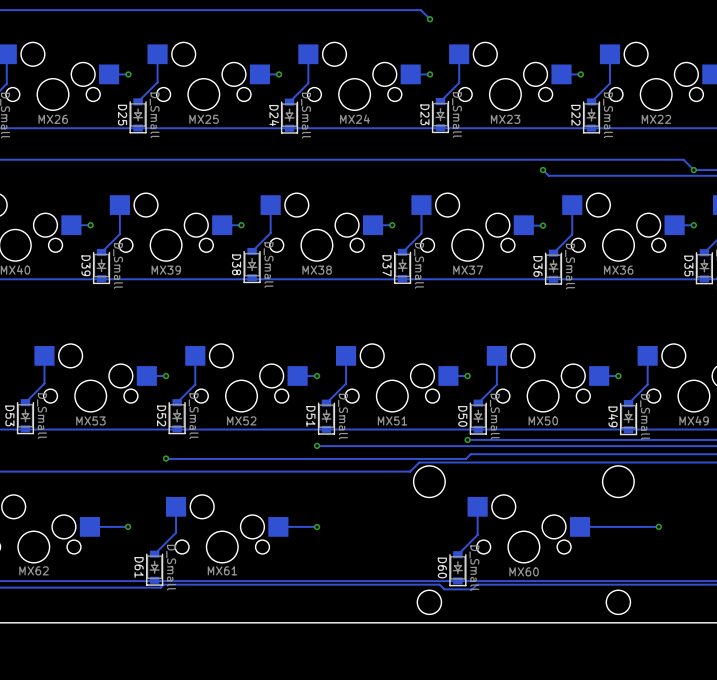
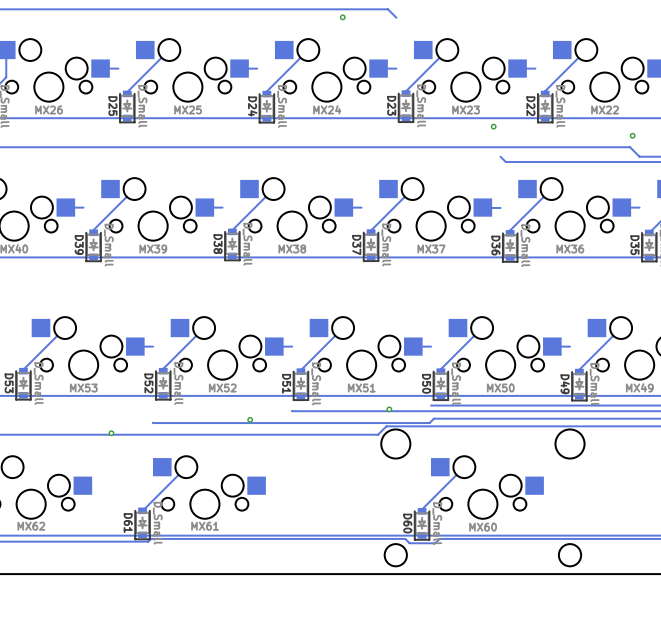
via: none -> (342, 17)
via: (430, 19) -> none
track: (157, 54) (157, 82) (138, 101) -> (169, 50) (127, 93)
track: (308, 54) (308, 83) (289, 102) -> (308, 50) (266, 91) (266, 94)
track: (459, 54) (459, 82) (440, 101) -> (447, 50) (406, 91) (406, 93)
track: (609, 54) (609, 83) (591, 101) -> (586, 50) (545, 91) (545, 93)
via: (128, 74) -> none
via: (279, 74) -> none
via: (430, 74) -> none
via: (580, 74) -> none
via position: (543, 170) -> (493, 126)
via position: (693, 170) -> (632, 135)
track: (119, 205) (119, 234) (101, 252) -> (134, 189) (93, 230) (93, 232)
track: (270, 205) (270, 232) (252, 251) -> (273, 189) (232, 231)
track: (421, 205) (421, 233) (402, 252) -> (412, 189) (371, 232)
track: (572, 205) (572, 234) (553, 253) -> (551, 189) (510, 230) (510, 233)
via: (90, 225) -> none
via: (241, 225) -> none
via: (392, 225) -> none
via: (543, 225) -> none
via: (693, 225) -> none
track: (44, 355) (44, 383) (25, 402) -> (65, 328) (23, 371)
track: (195, 355) (195, 384) (177, 402) -> (204, 328) (163, 368) (163, 371)
track: (346, 355) (346, 383) (326, 403) -> (343, 328) (300, 371)
track: (496, 355) (496, 384) (478, 403) -> (482, 328) (440, 369) (440, 371)
track: (647, 355) (647, 384) (628, 403) -> (621, 328) (579, 369) (579, 372)
via: (166, 376) -> none
via: (317, 376) -> none
via: (467, 376) -> none
via: (618, 376) -> none
via: (467, 439) -> none
via: none -> (389, 409)
via: (317, 445) -> none
via: none -> (250, 419)
via: (166, 458) -> none
via: none -> (111, 433)
track: (176, 506) (176, 532) (154, 554) -> (186, 467) (142, 510)
track: (477, 506) (477, 535) (457, 554) -> (464, 467) (422, 511)
track: (127, 526) (89, 526) -> none
via: (128, 526) -> none
track: (278, 526) (317, 527) -> none
track: (658, 526) (579, 526) -> none
via: (658, 526) -> none
via: (317, 527) -> none

